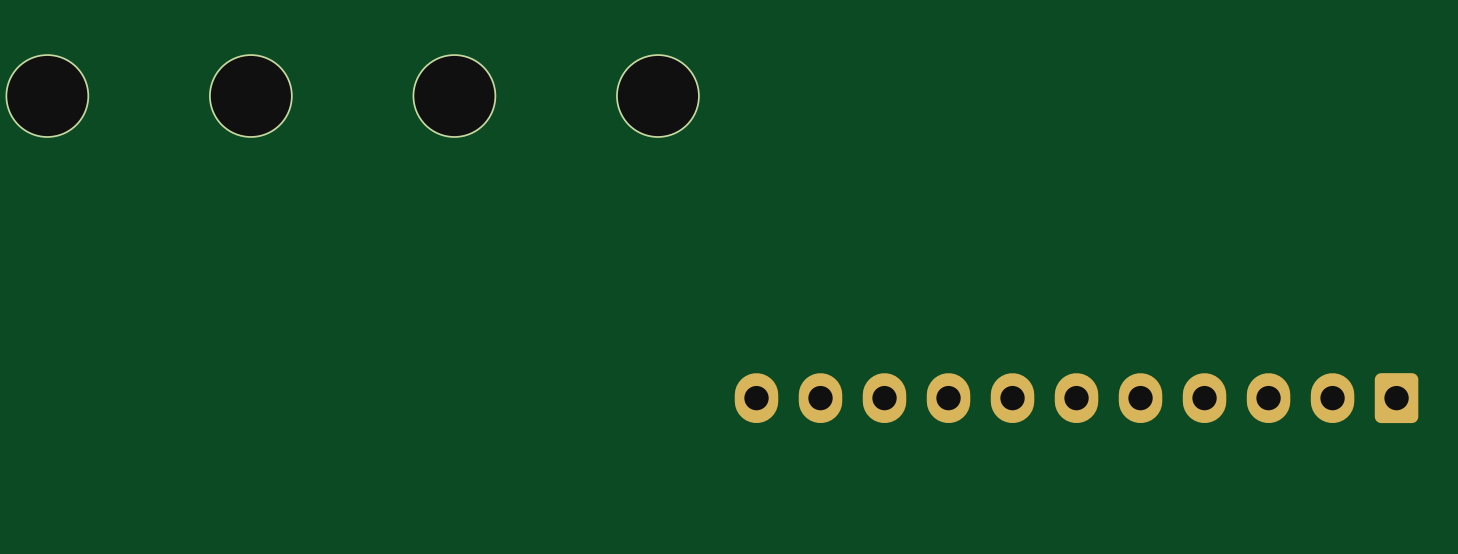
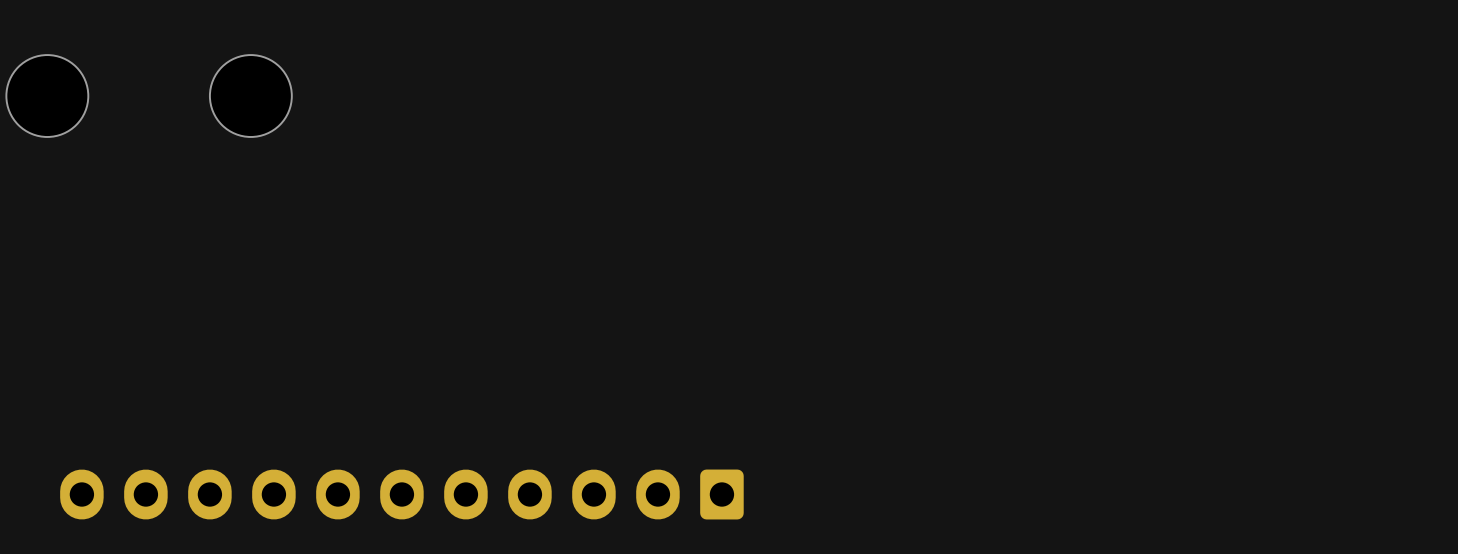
part: (454, 96) -> none
part: (657, 96) -> none
part: (1076, 398) -> none
part: none -> (401, 494)

